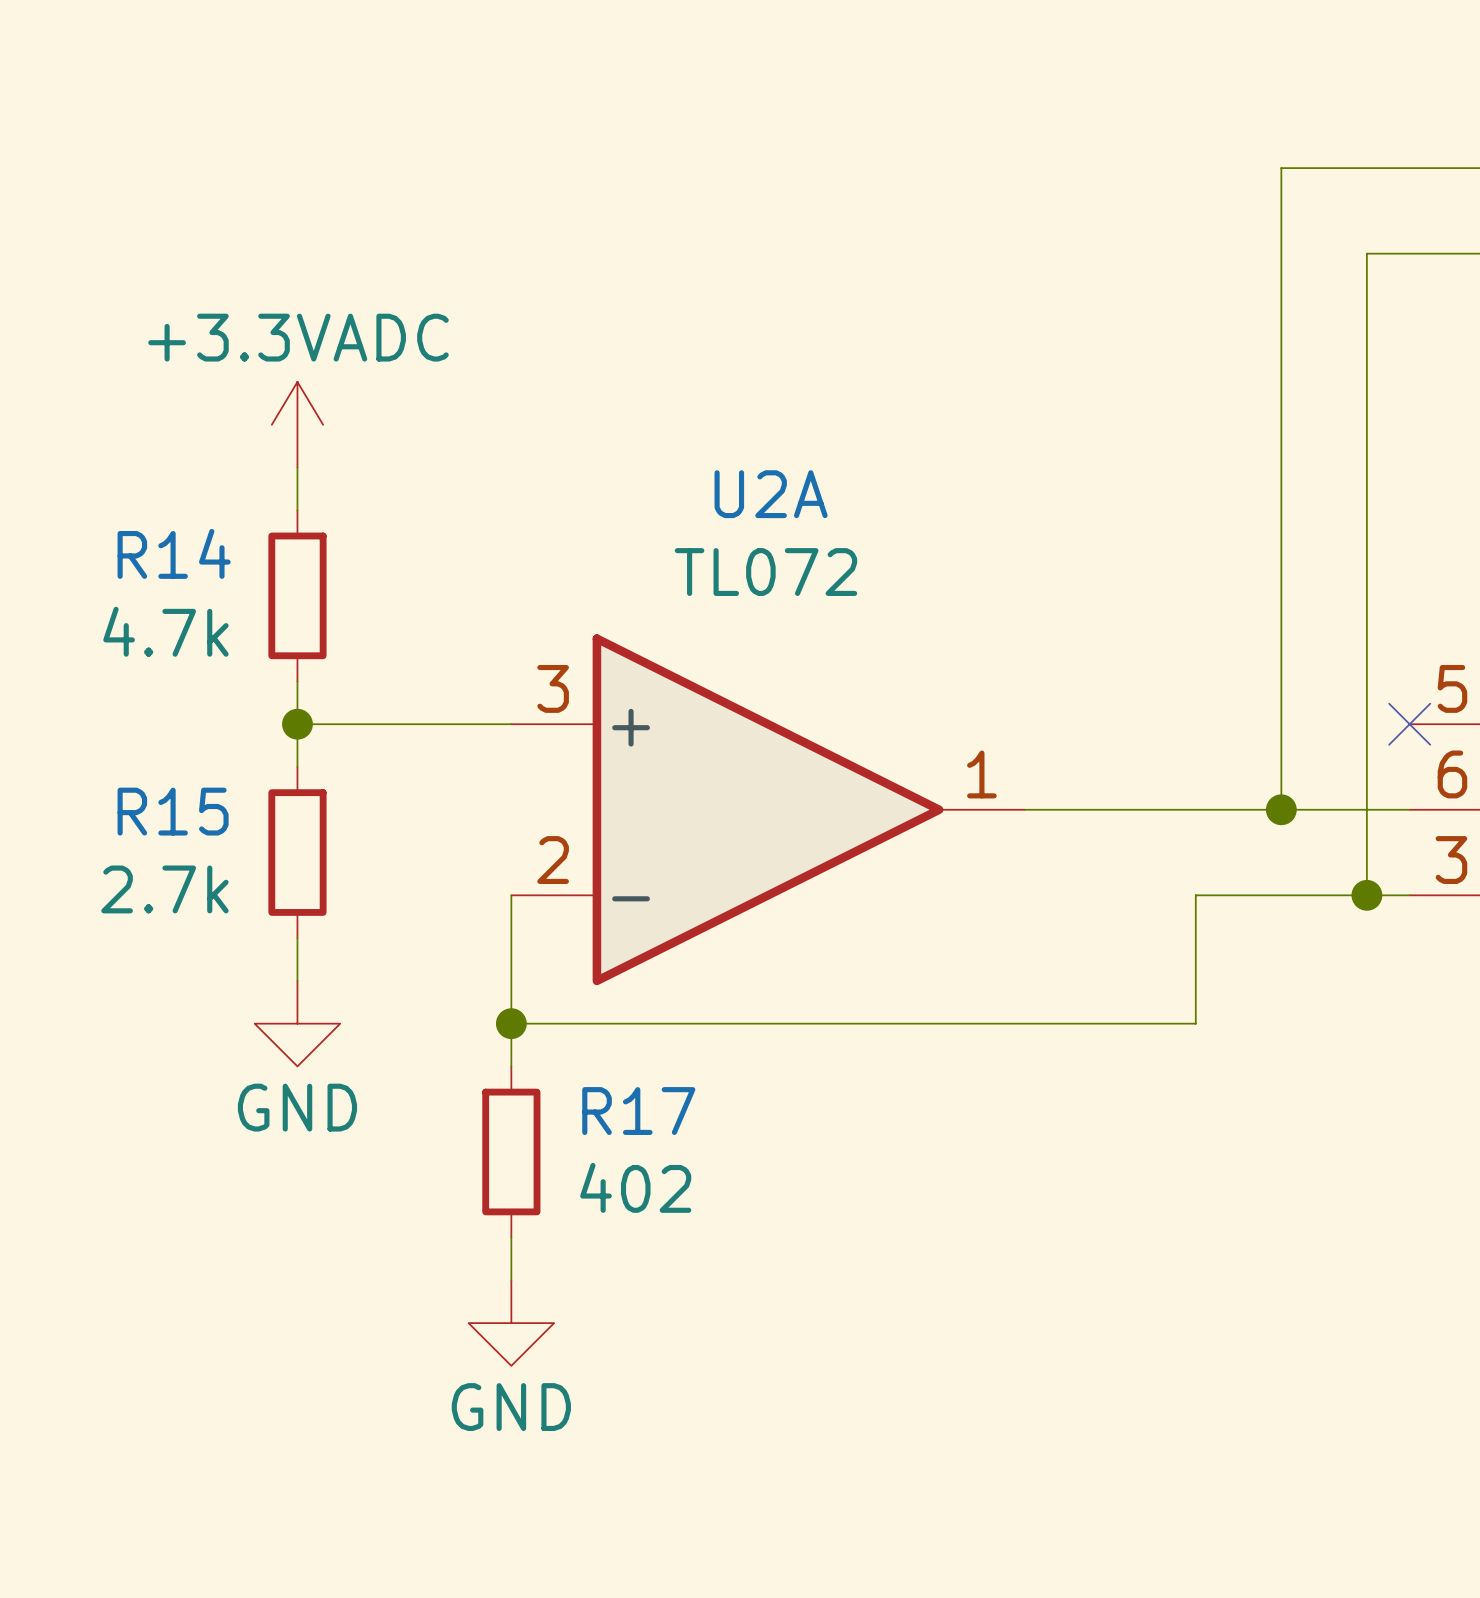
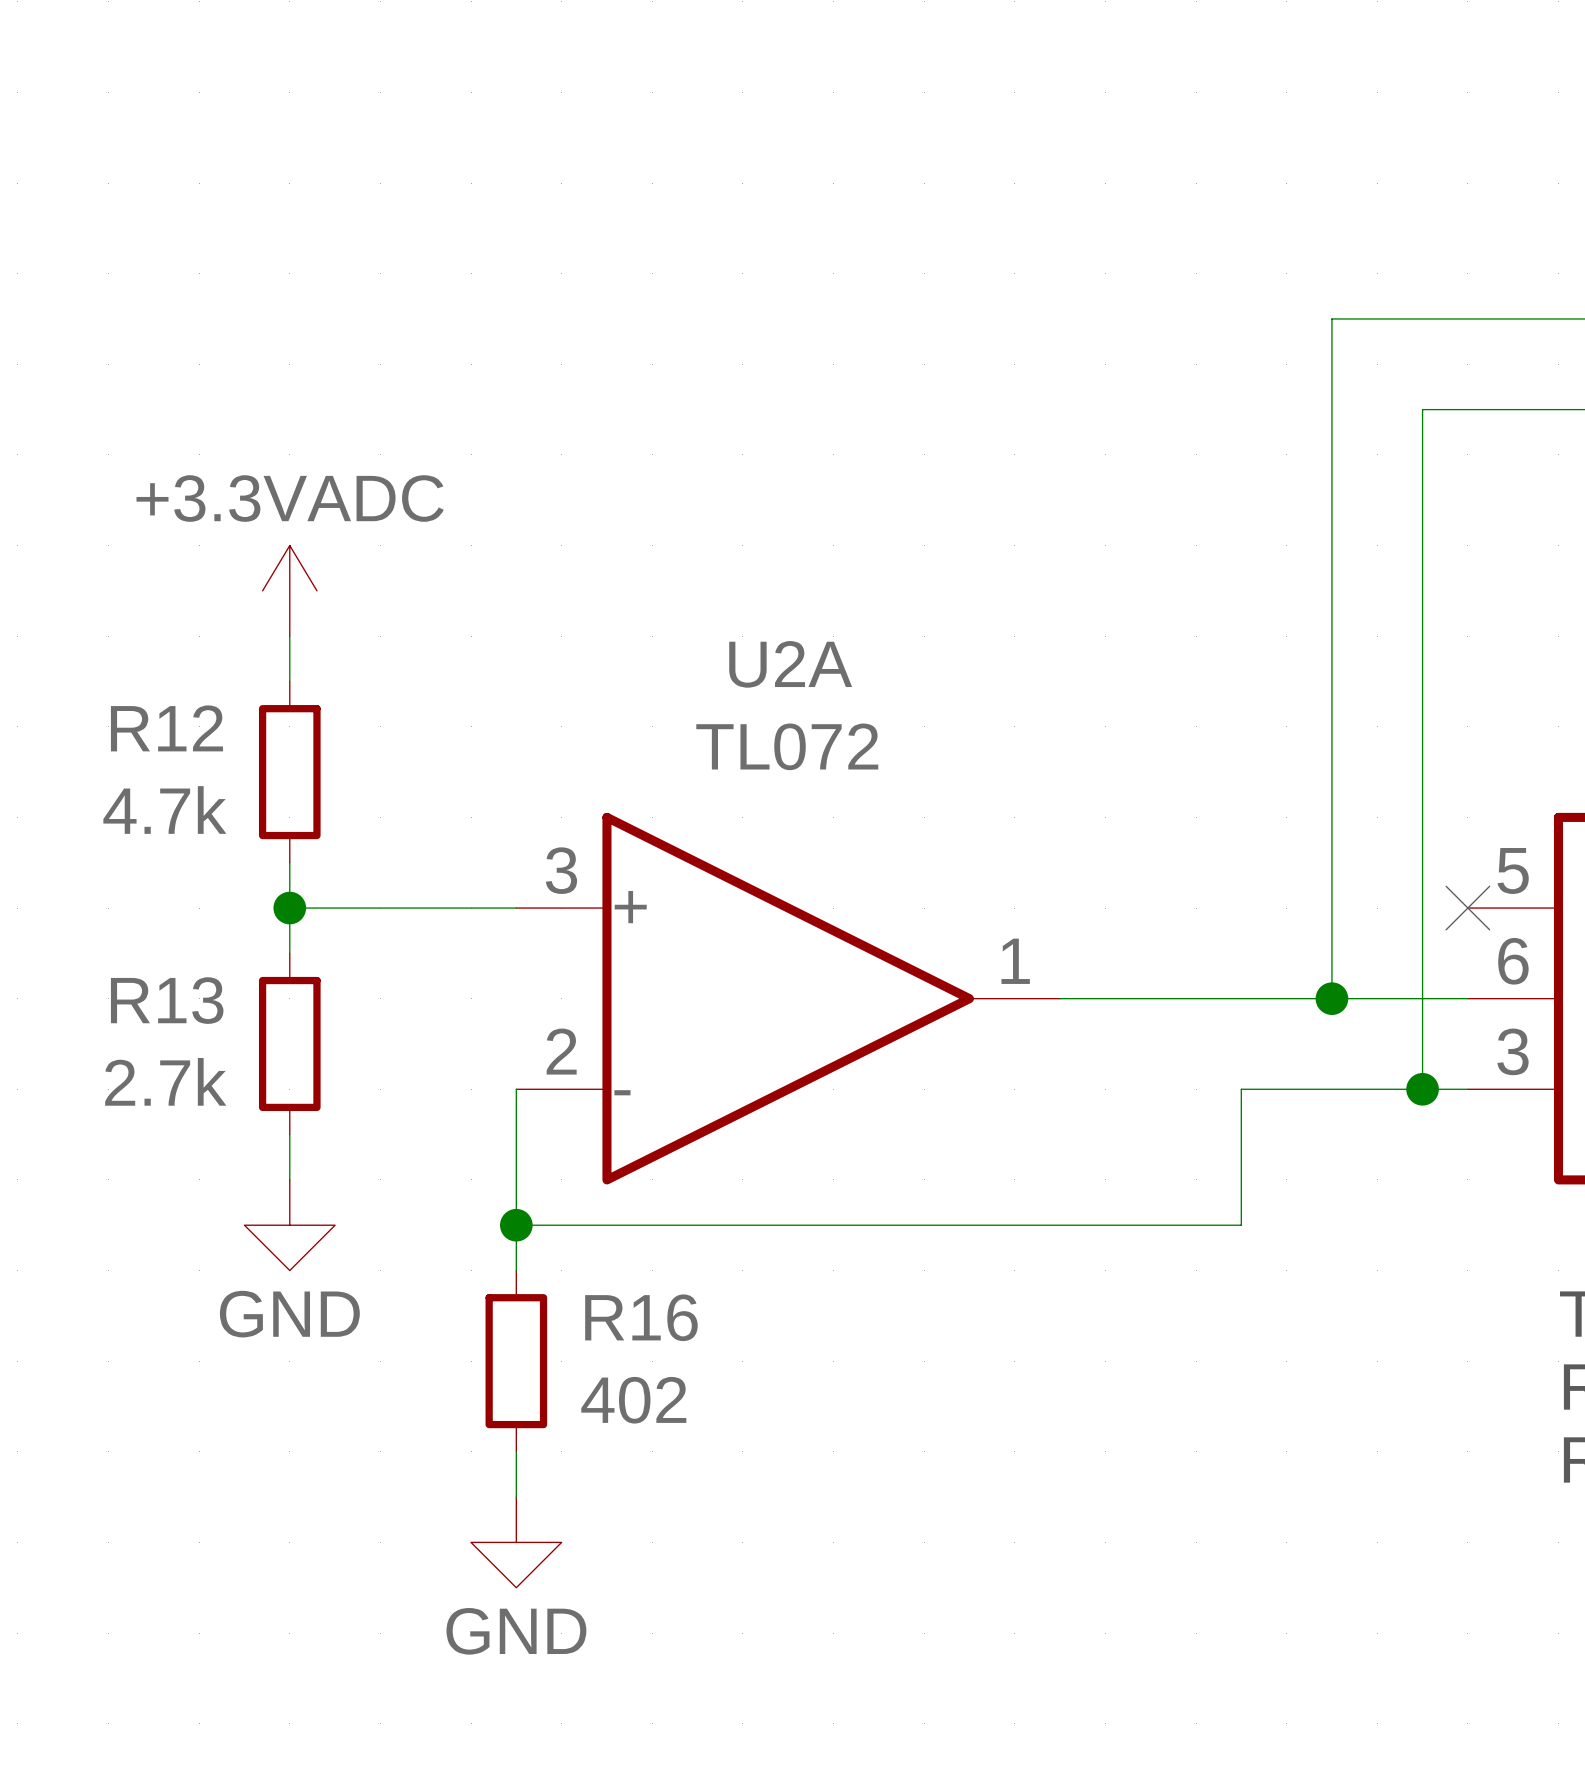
R14 name: R14 (174, 553) -> R12 (166, 728)
R15 name: R15 (173, 811) -> R13 (167, 1000)
R17 name: R17 (638, 1111) -> R16 (641, 1317)

